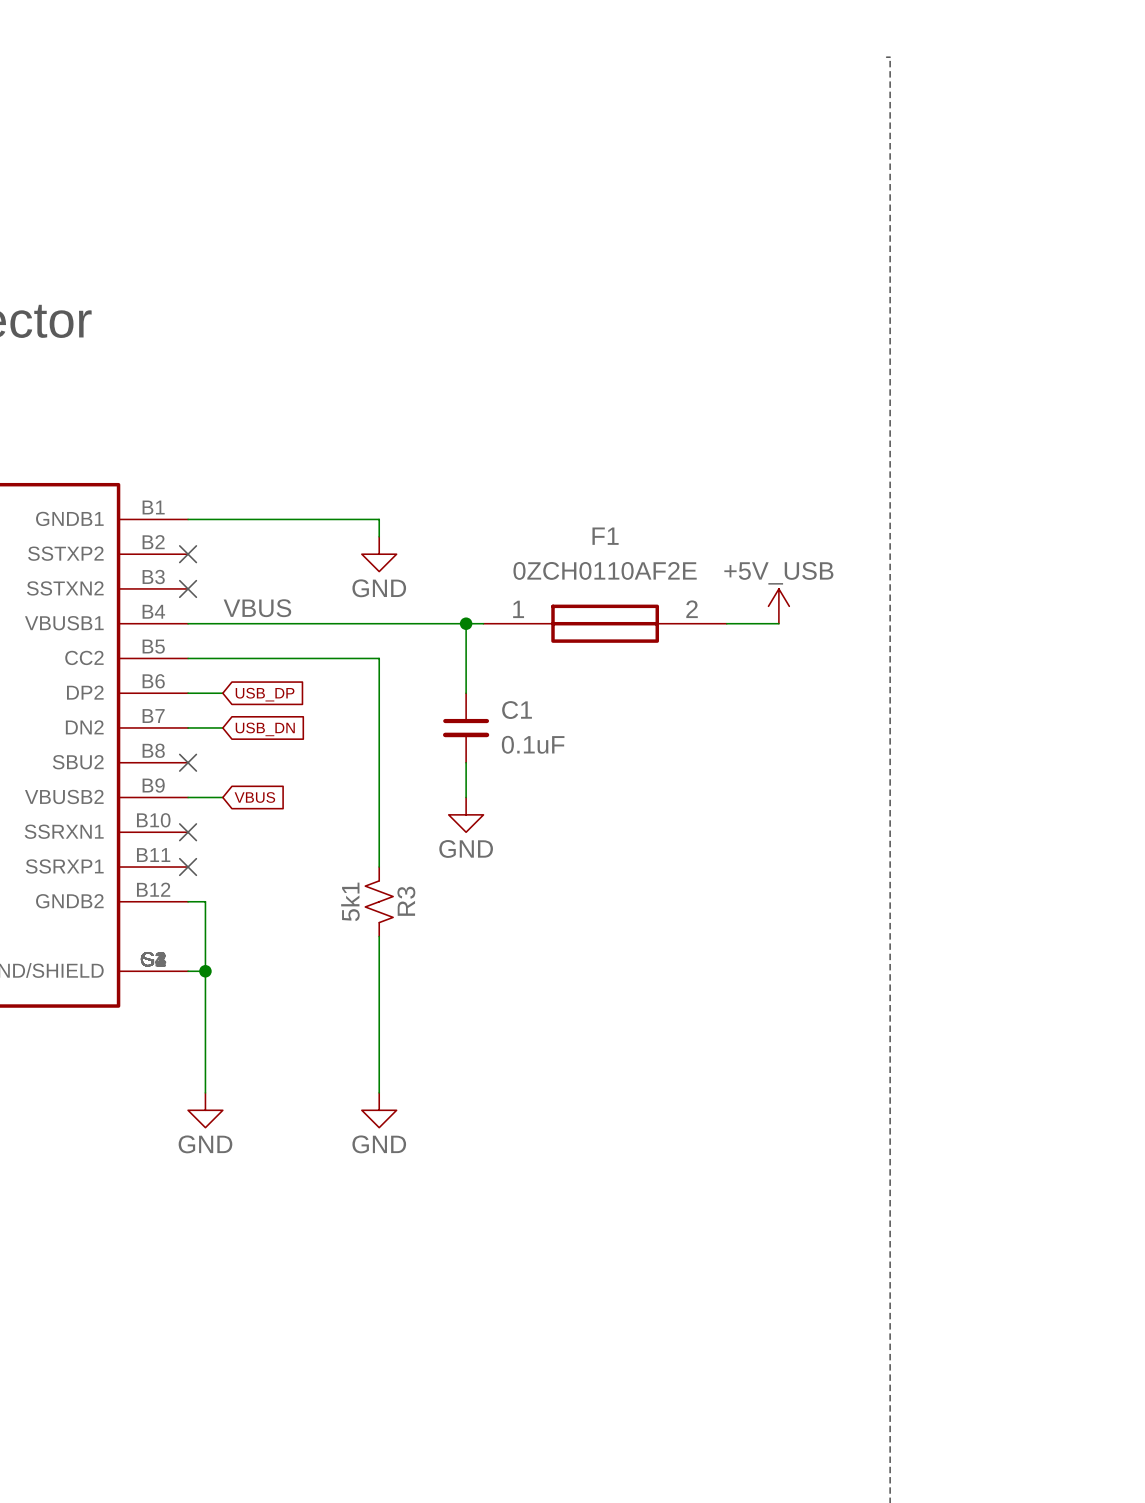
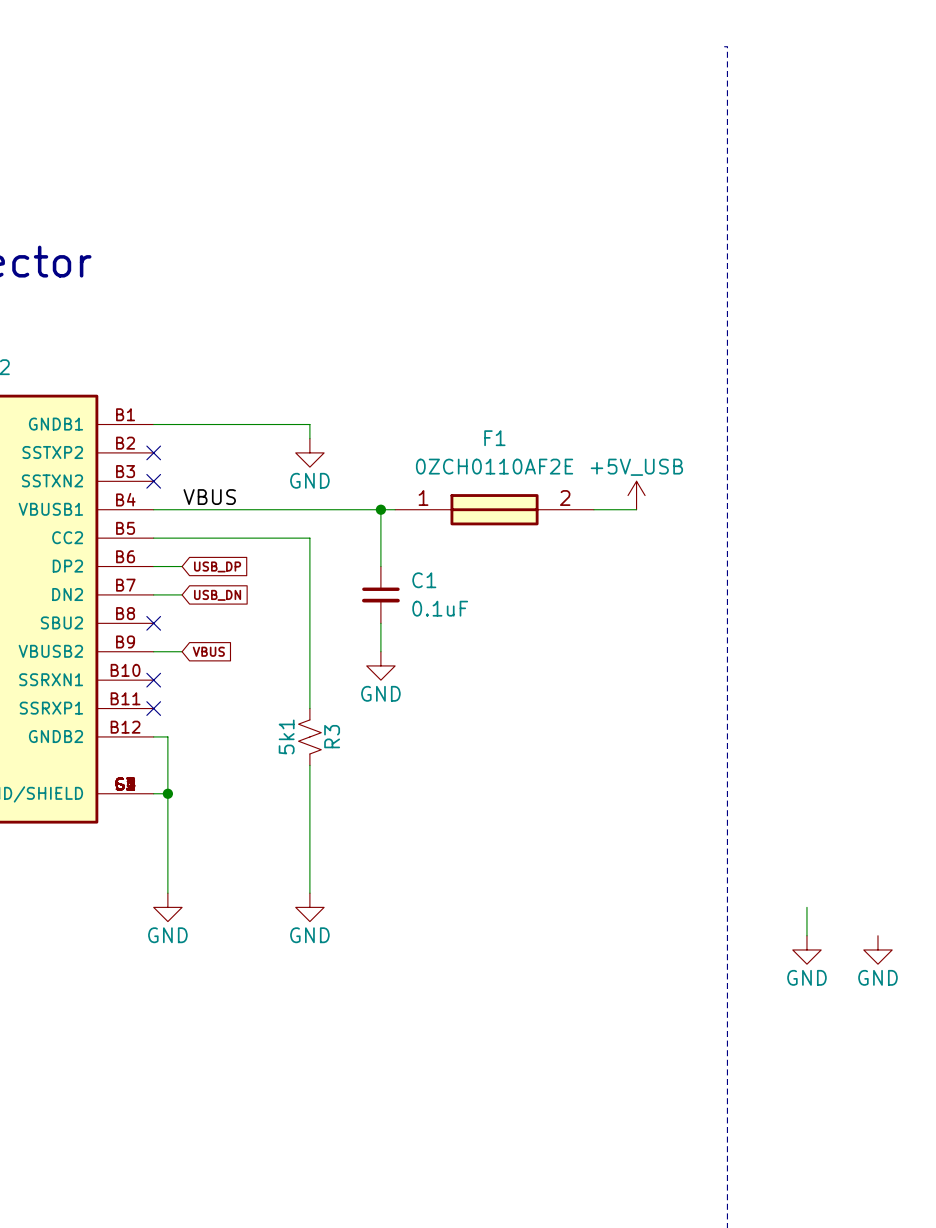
wire: none -> (806, 907) (806, 935)
power symbol: none -> GND (806, 949)
power symbol: none -> GND (877, 949)

